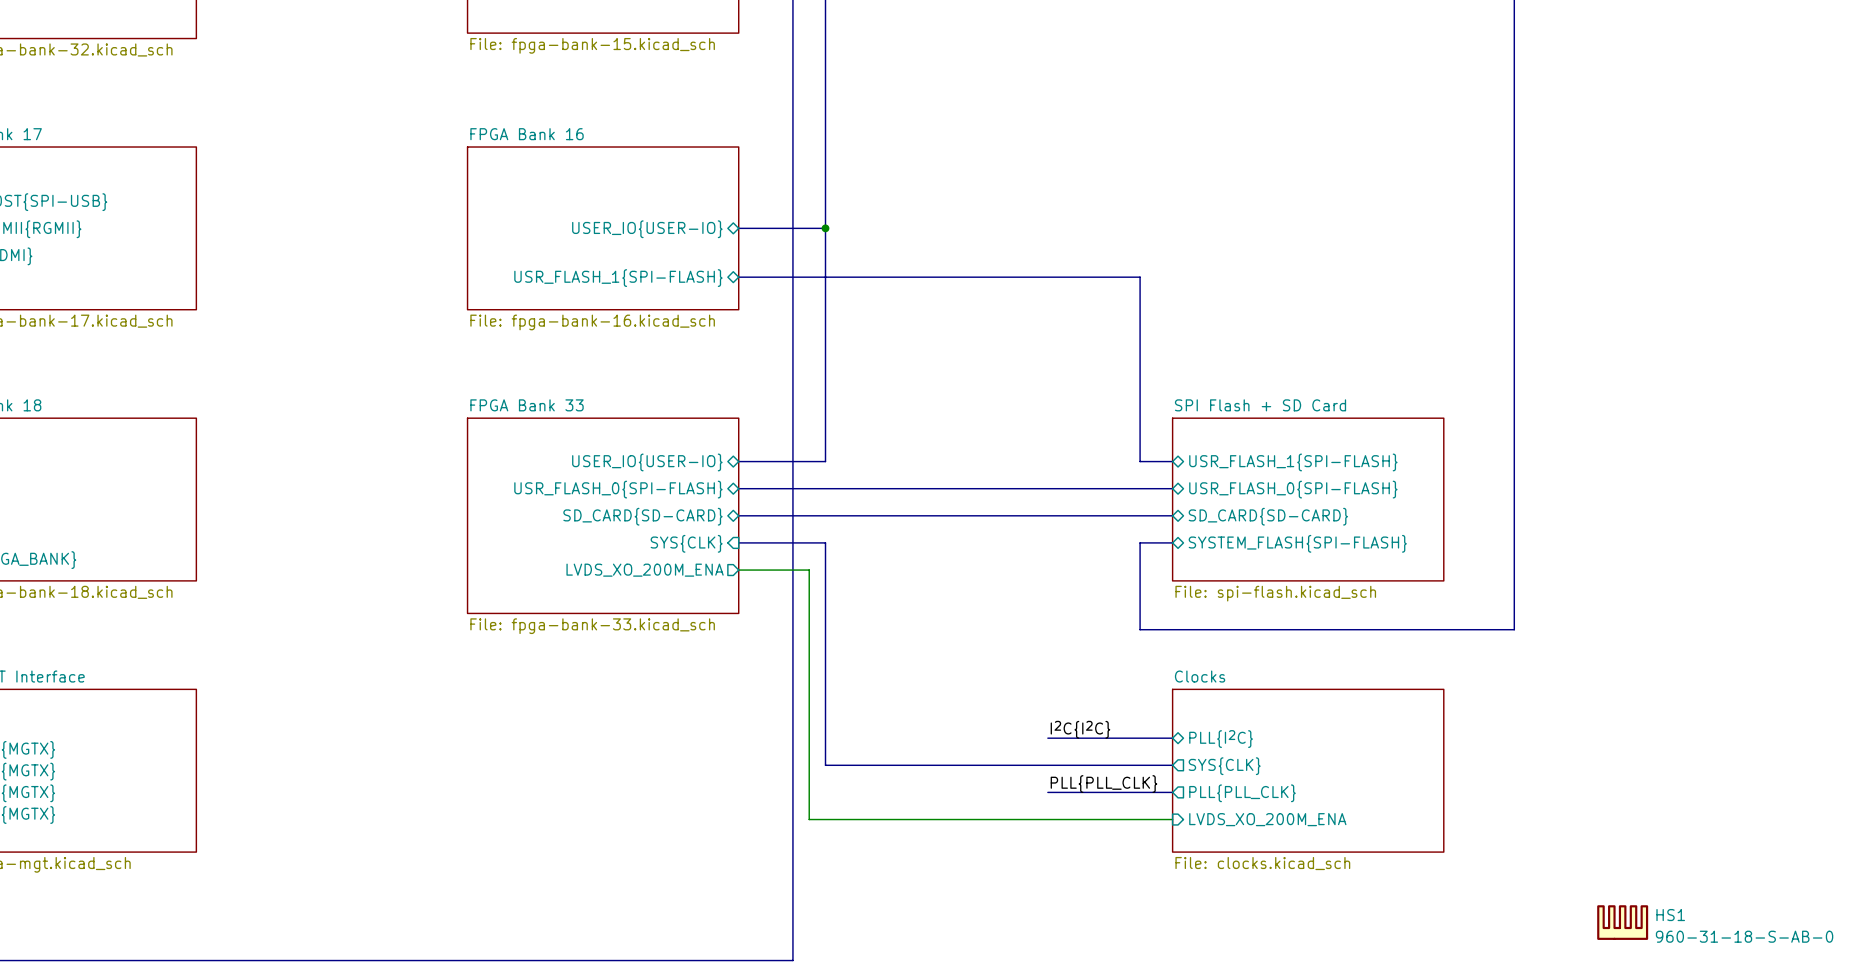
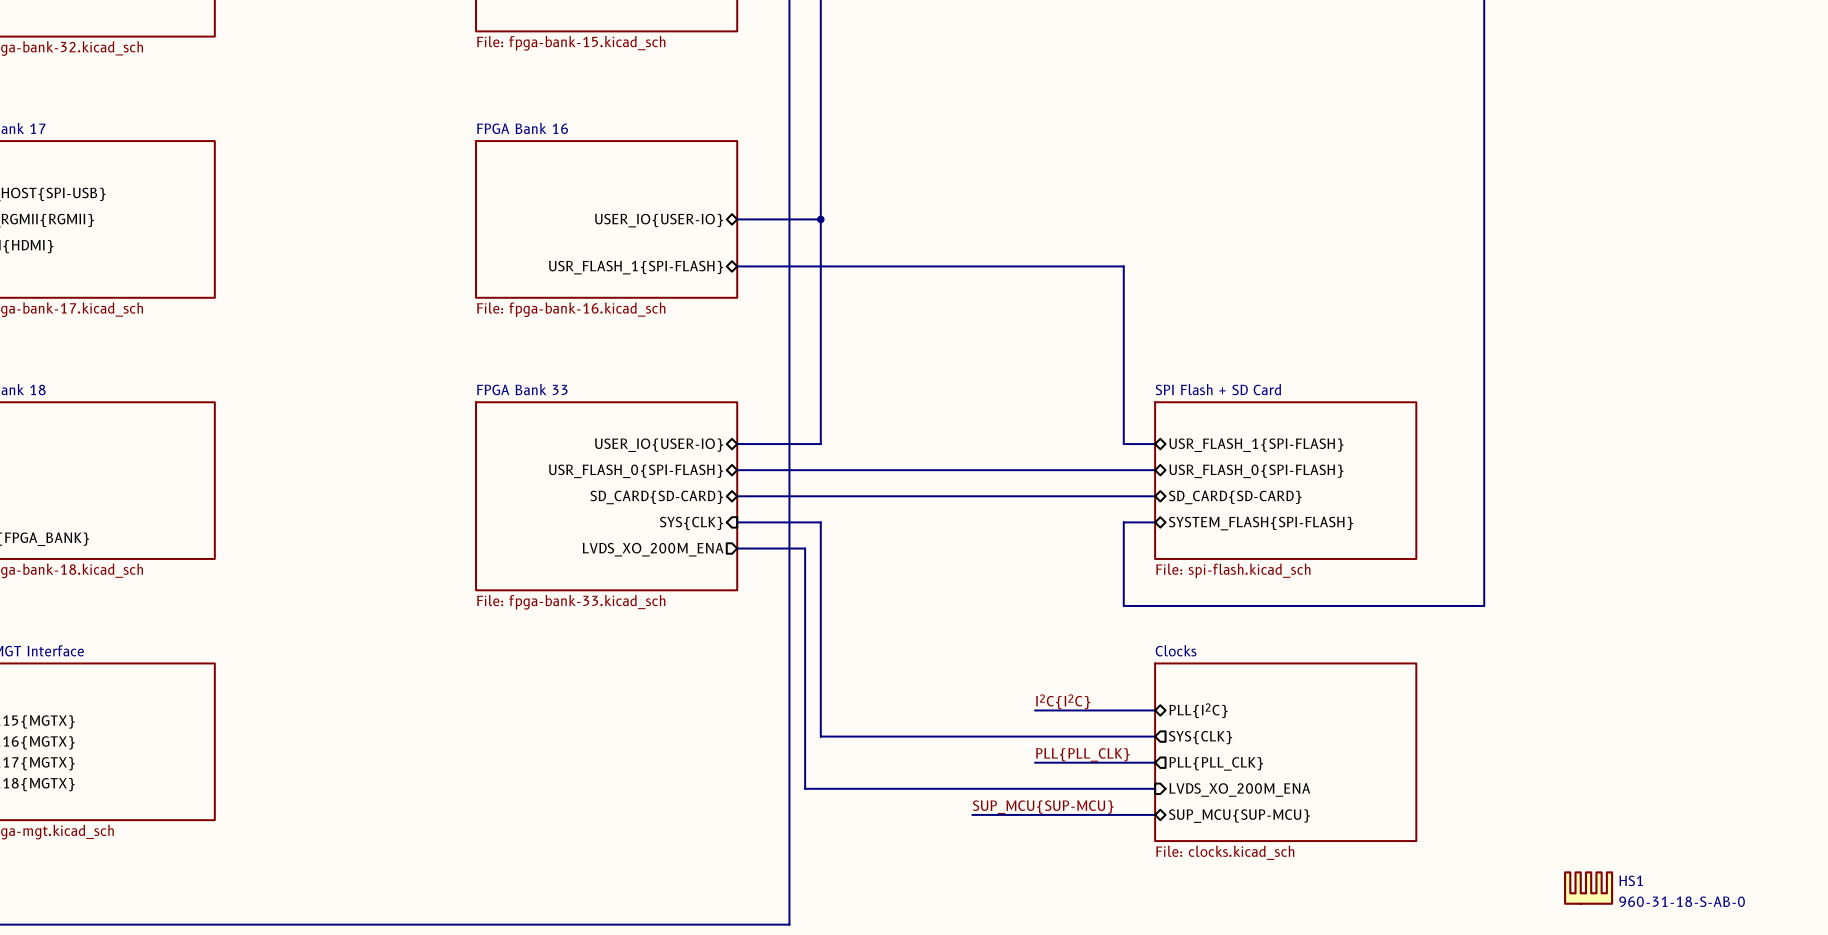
sheet Clocks: File: clocks.kicad_sch (1308, 770) -> none
sheet Clocks: none -> File: clocks.kicad_sch (1285, 752)
label: none -> SUP_MCU{SUP-MCU} (1043, 807)
bus: none -> (972, 814) (1155, 814)
sheet pin: none -> SUP_MCU{SUP-MCU} (1239, 816)

